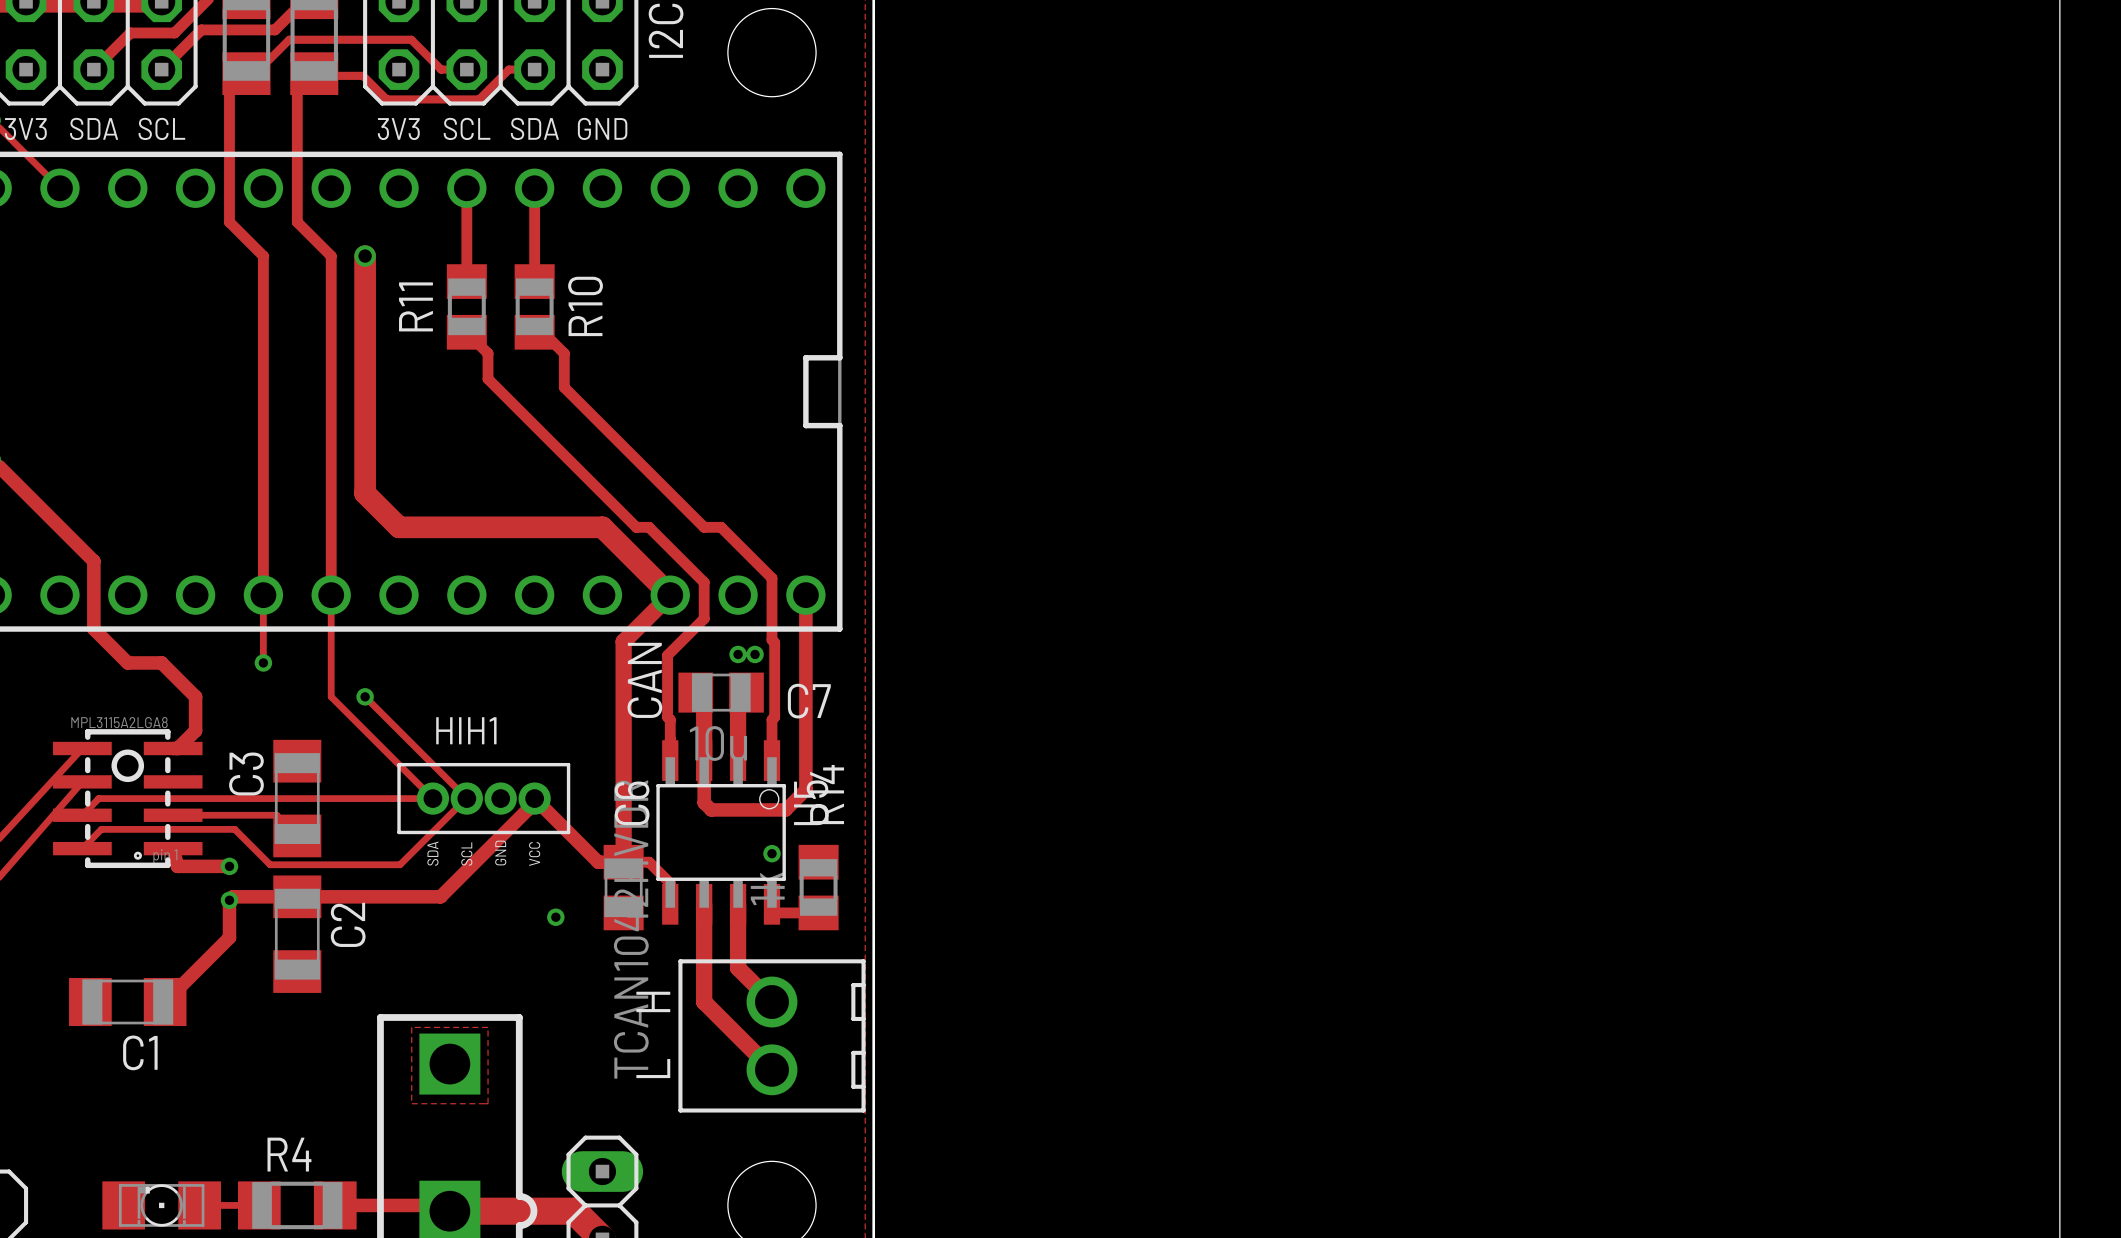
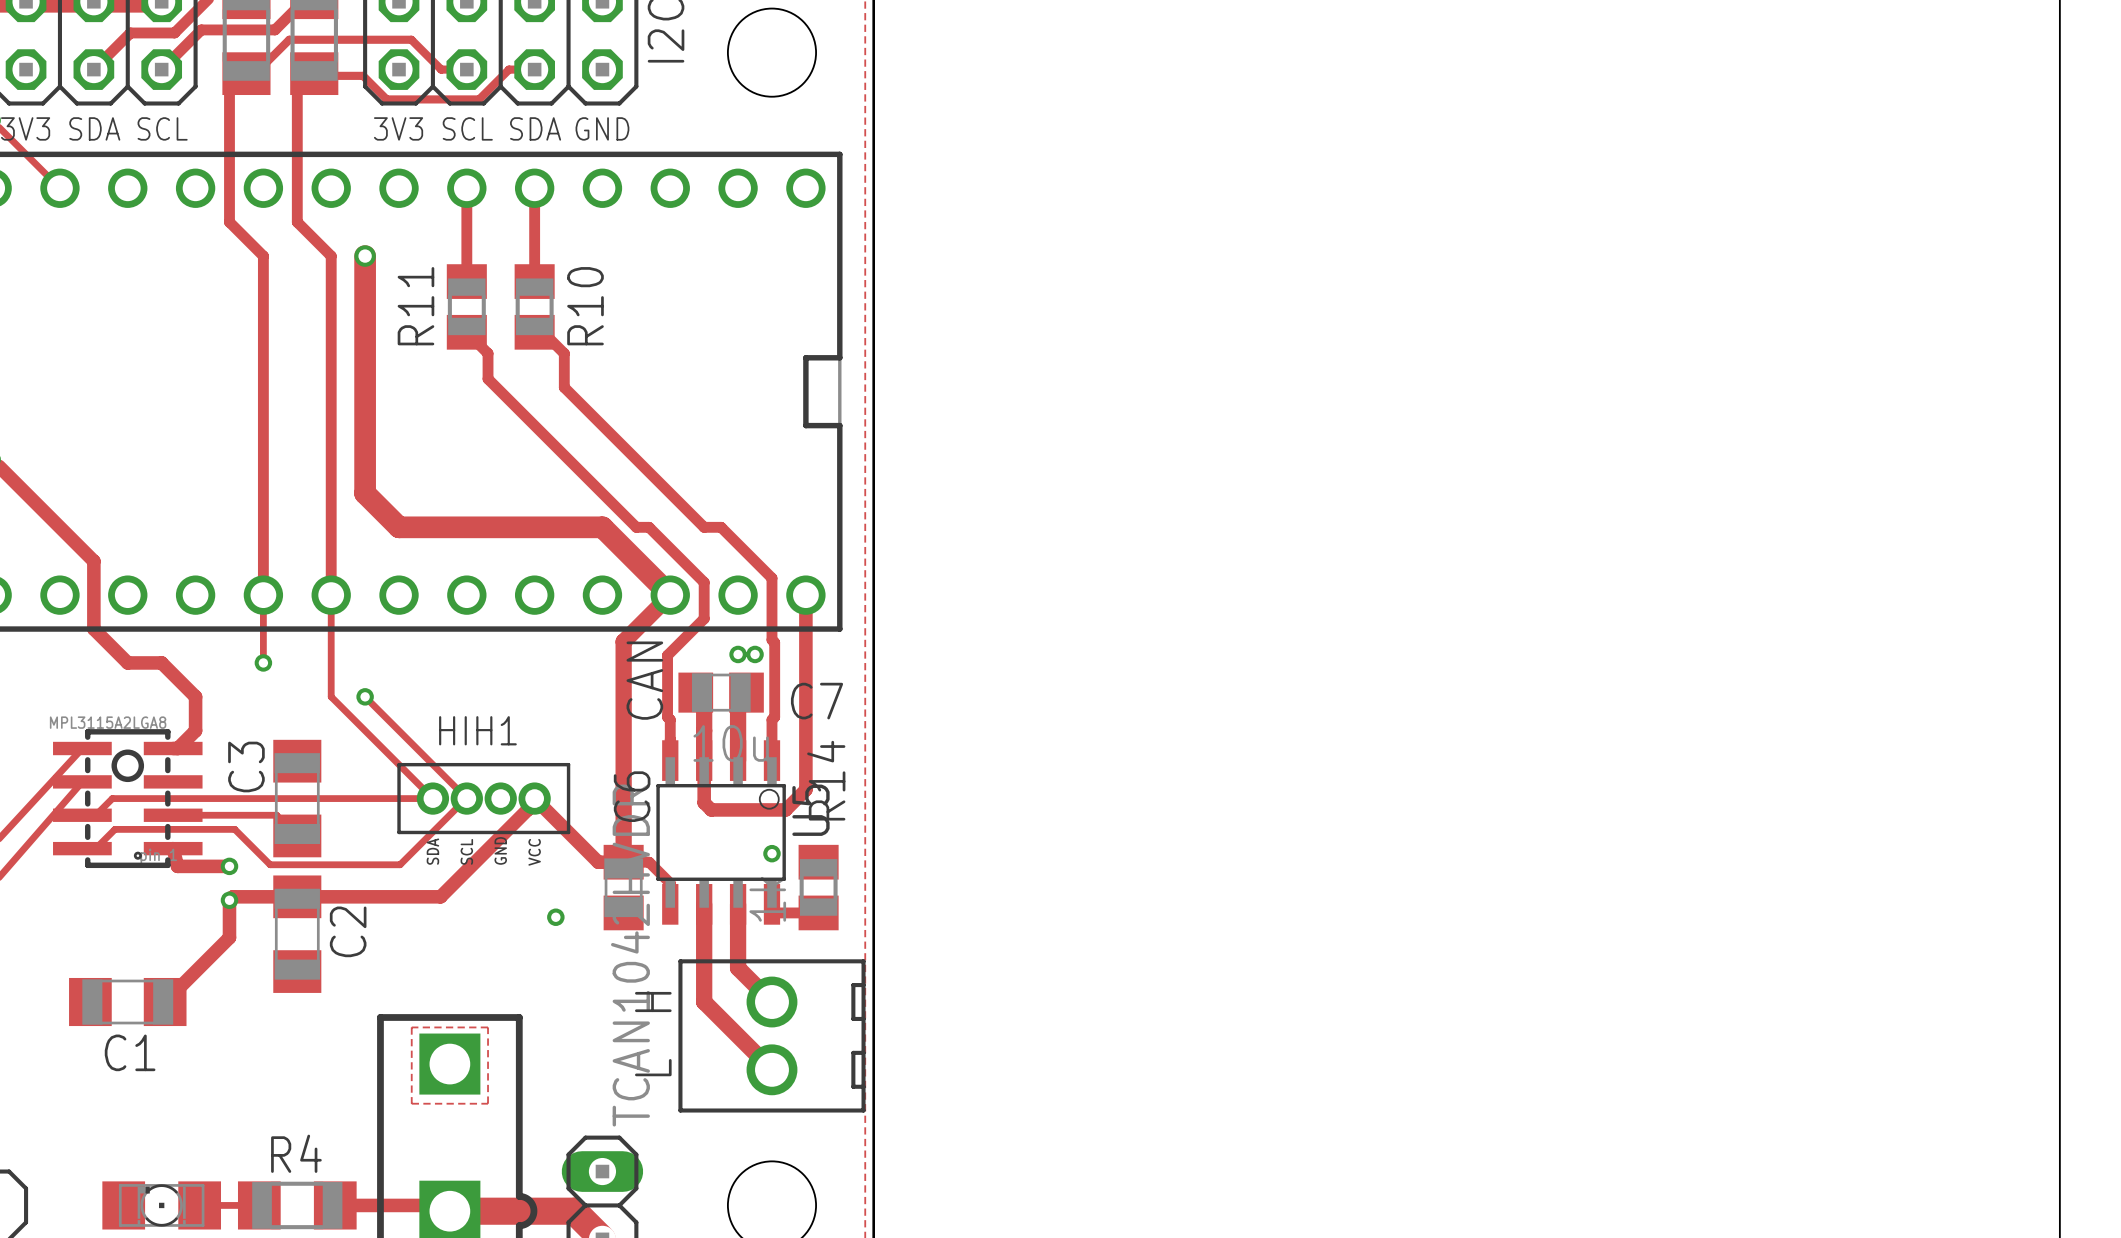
track: (112, 798) (98, 798) (82, 815) -> (112, 798) (95, 815)
track: (114, 829) (101, 829) (82, 848) -> (114, 829) (95, 848)

